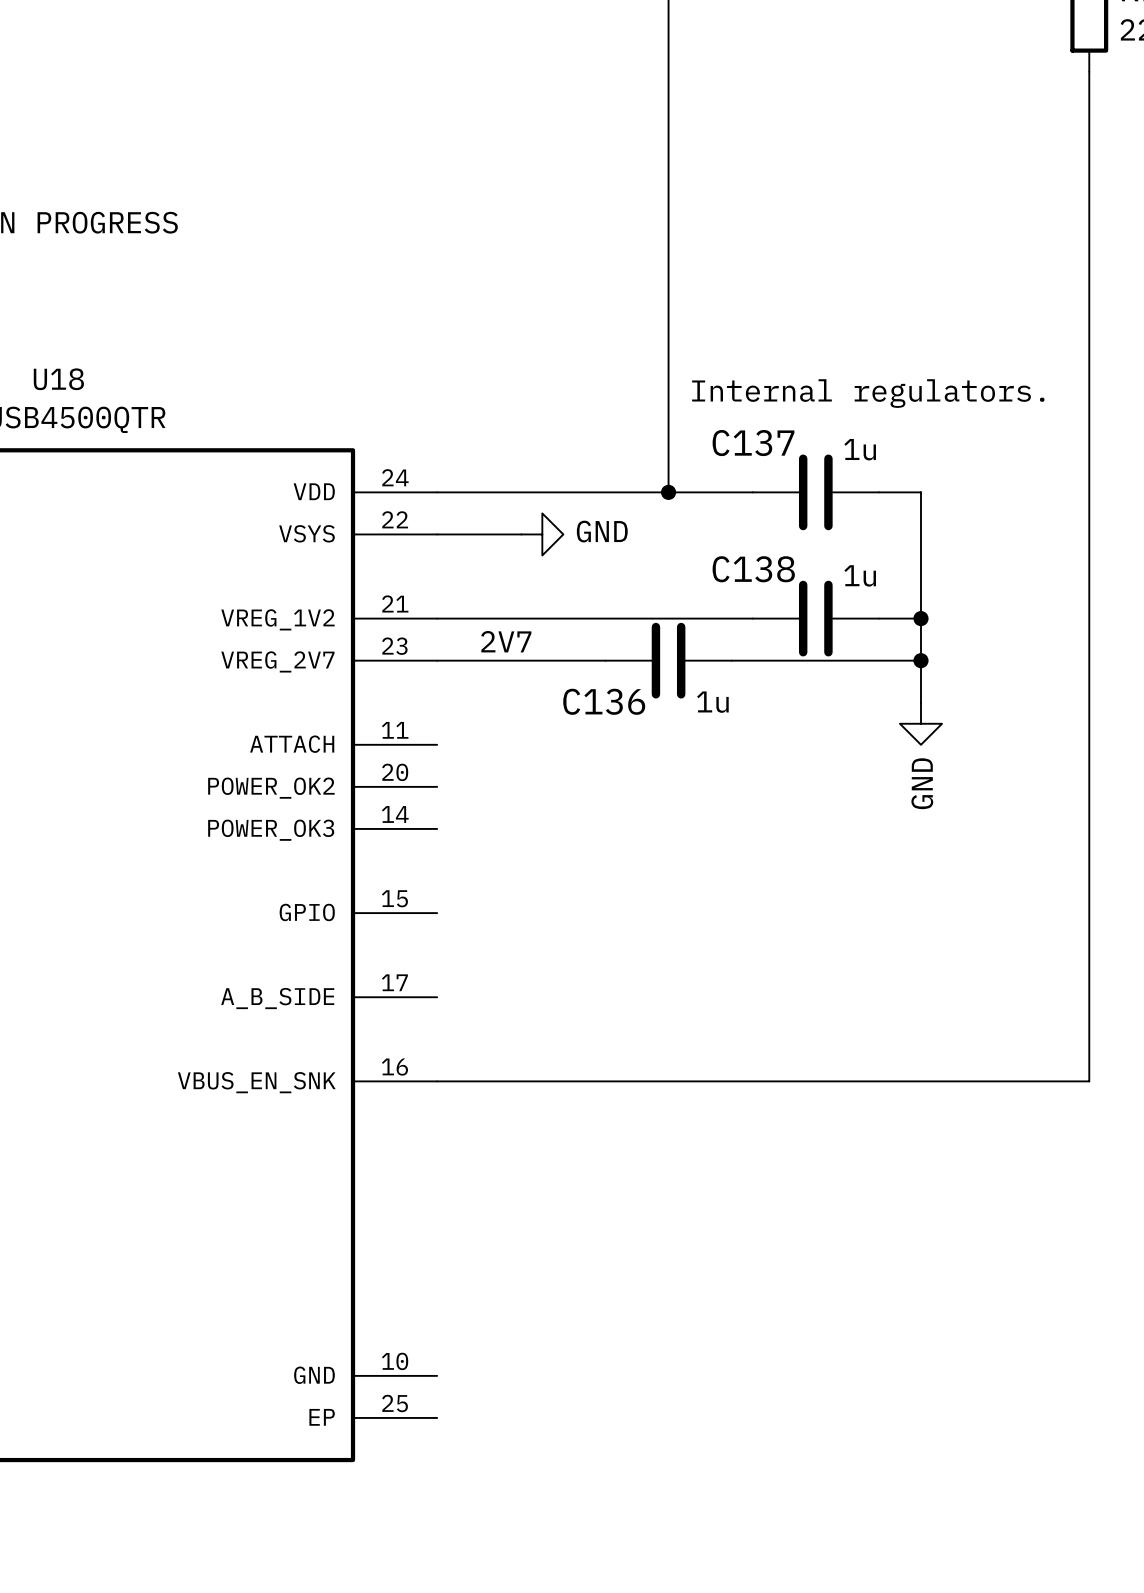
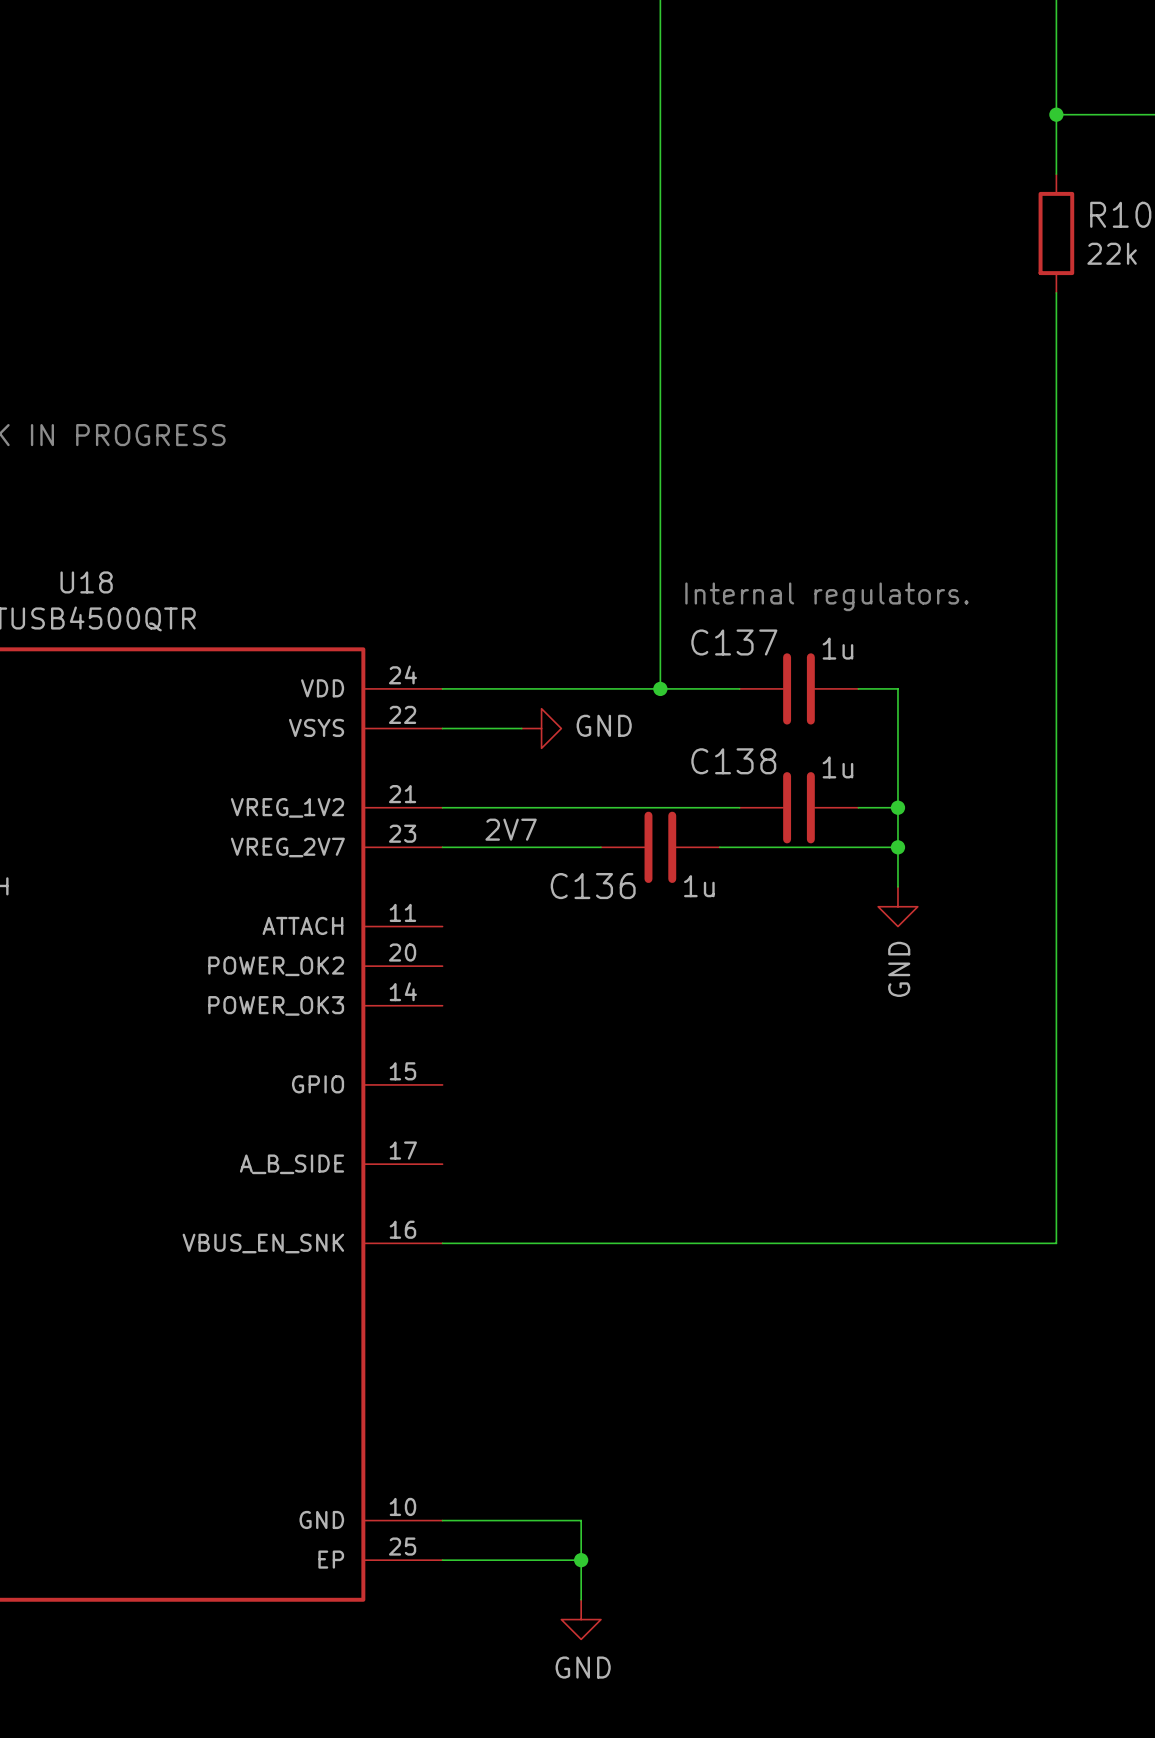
wire: none -> (442, 1520) (581, 1520) (581, 1599)
wire: none -> (442, 1560) (581, 1560)
junction: none -> (581, 1560)
power symbol: none -> GND (581, 1619)

